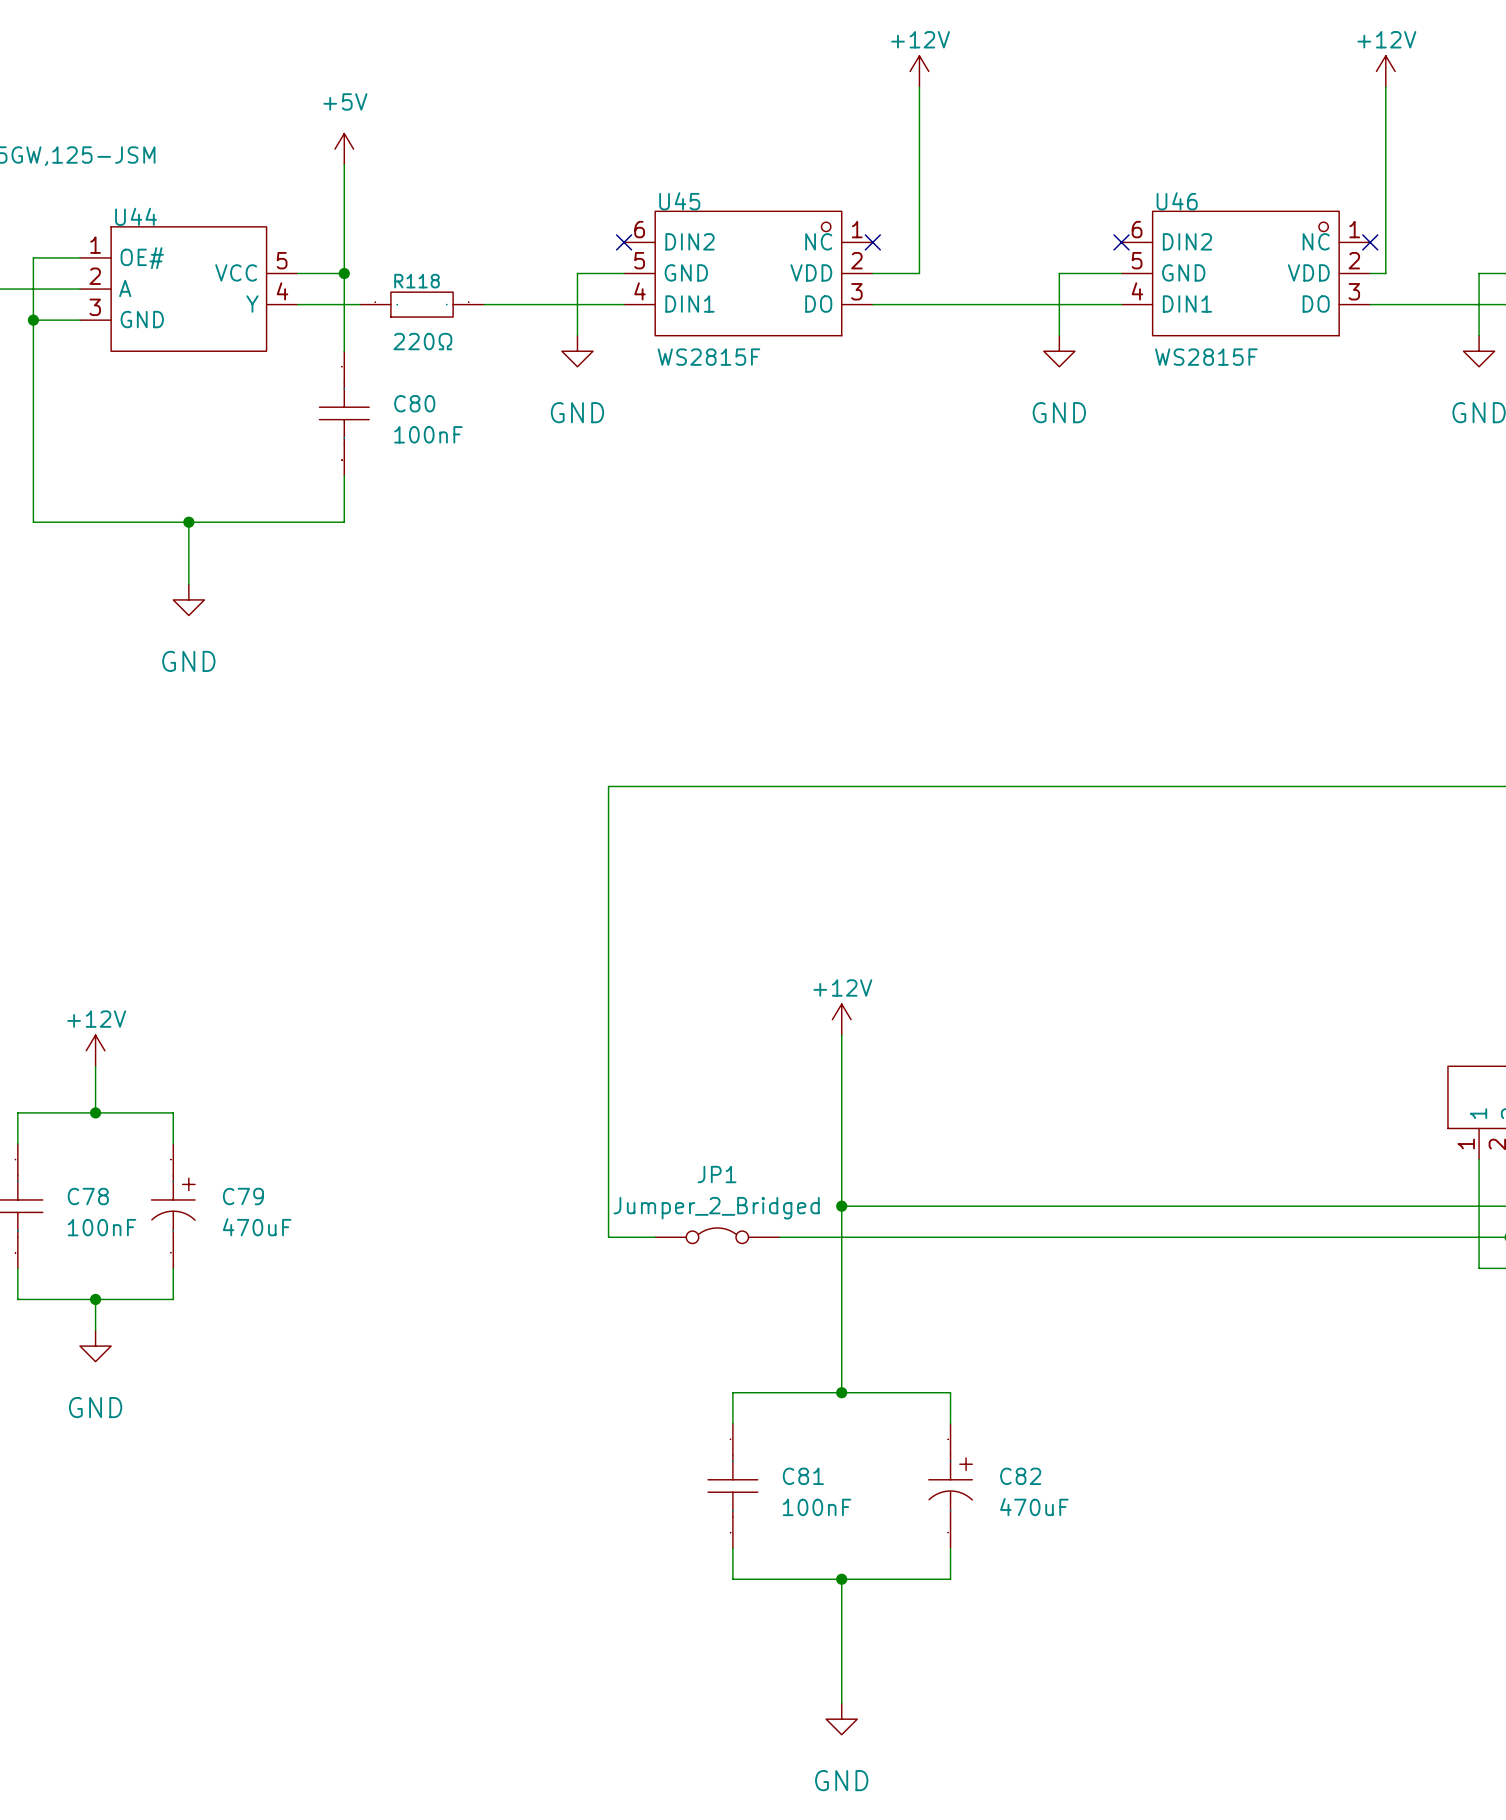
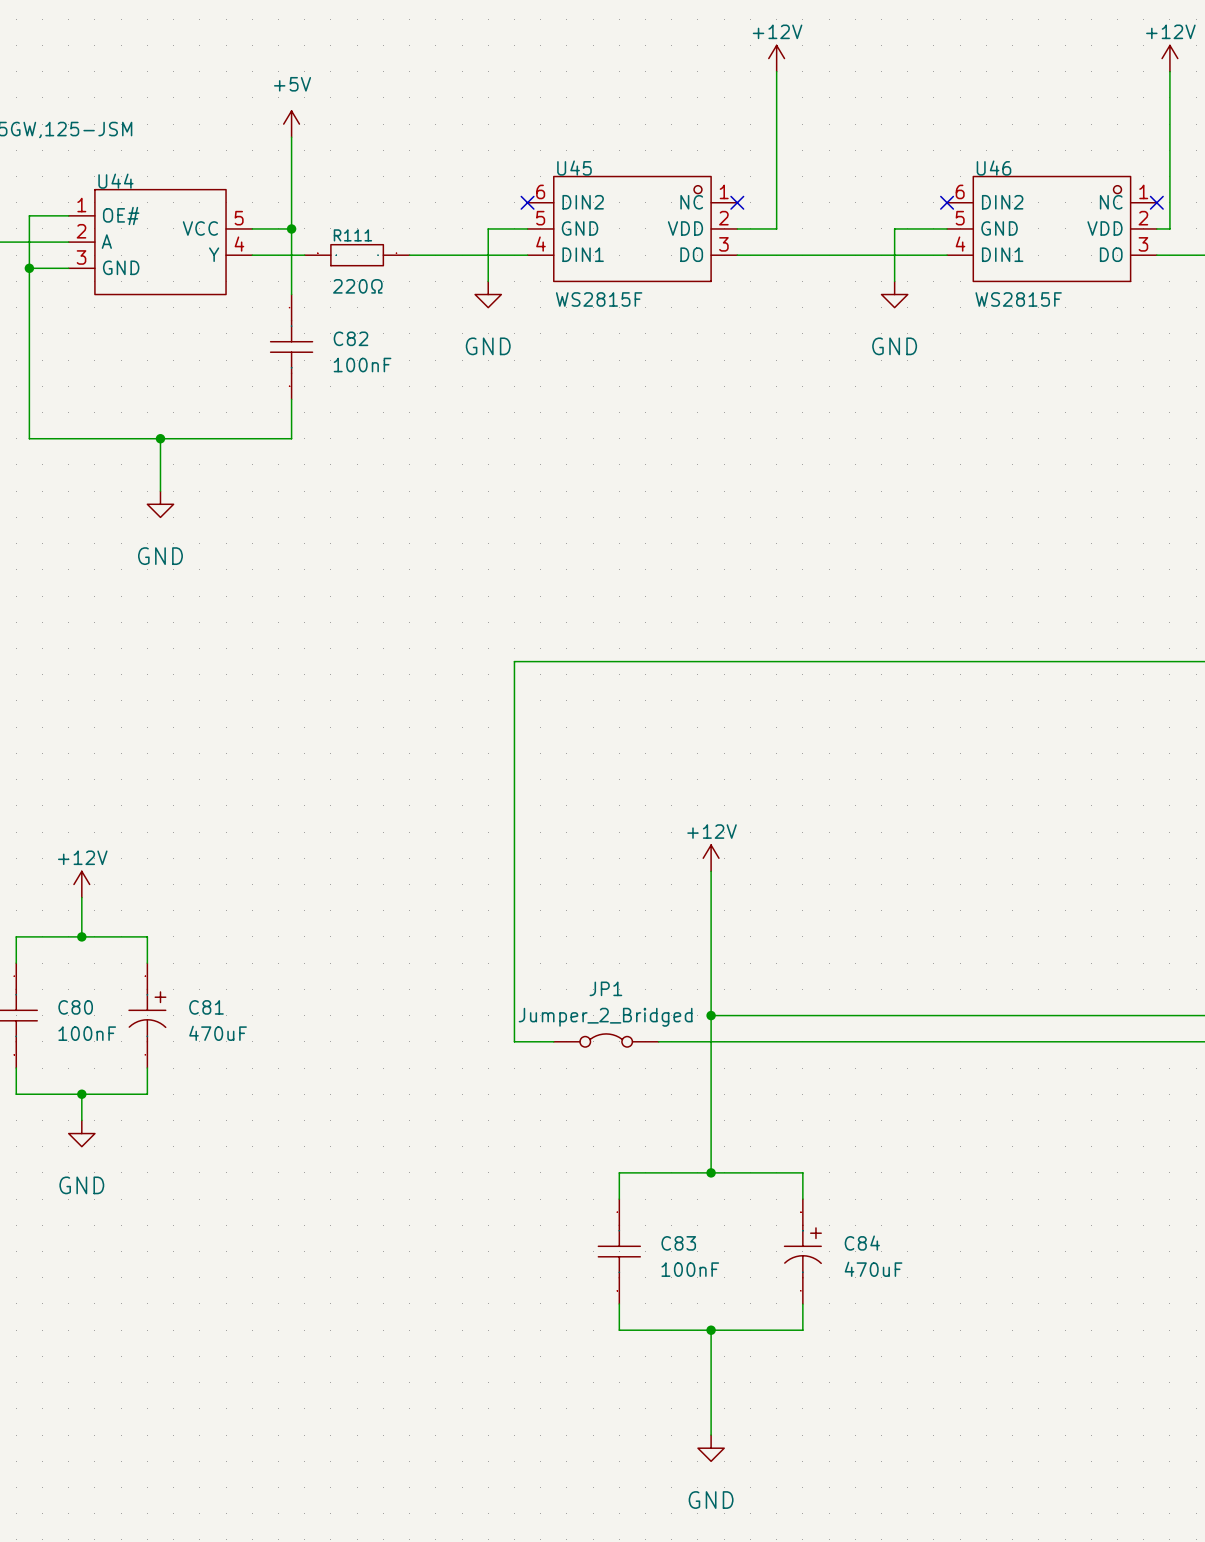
R118 name: R118 (417, 281) -> R111 (352, 235)
C80 name: C80 (414, 403) -> C82 (350, 338)
C78 name: C78 (88, 1196) -> C80 (75, 1007)
C79 name: C79 (243, 1196) -> C81 (206, 1007)
C81 name: C81 (803, 1476) -> C83 (678, 1243)
C82 name: C82 (1020, 1476) -> C84 (862, 1243)

